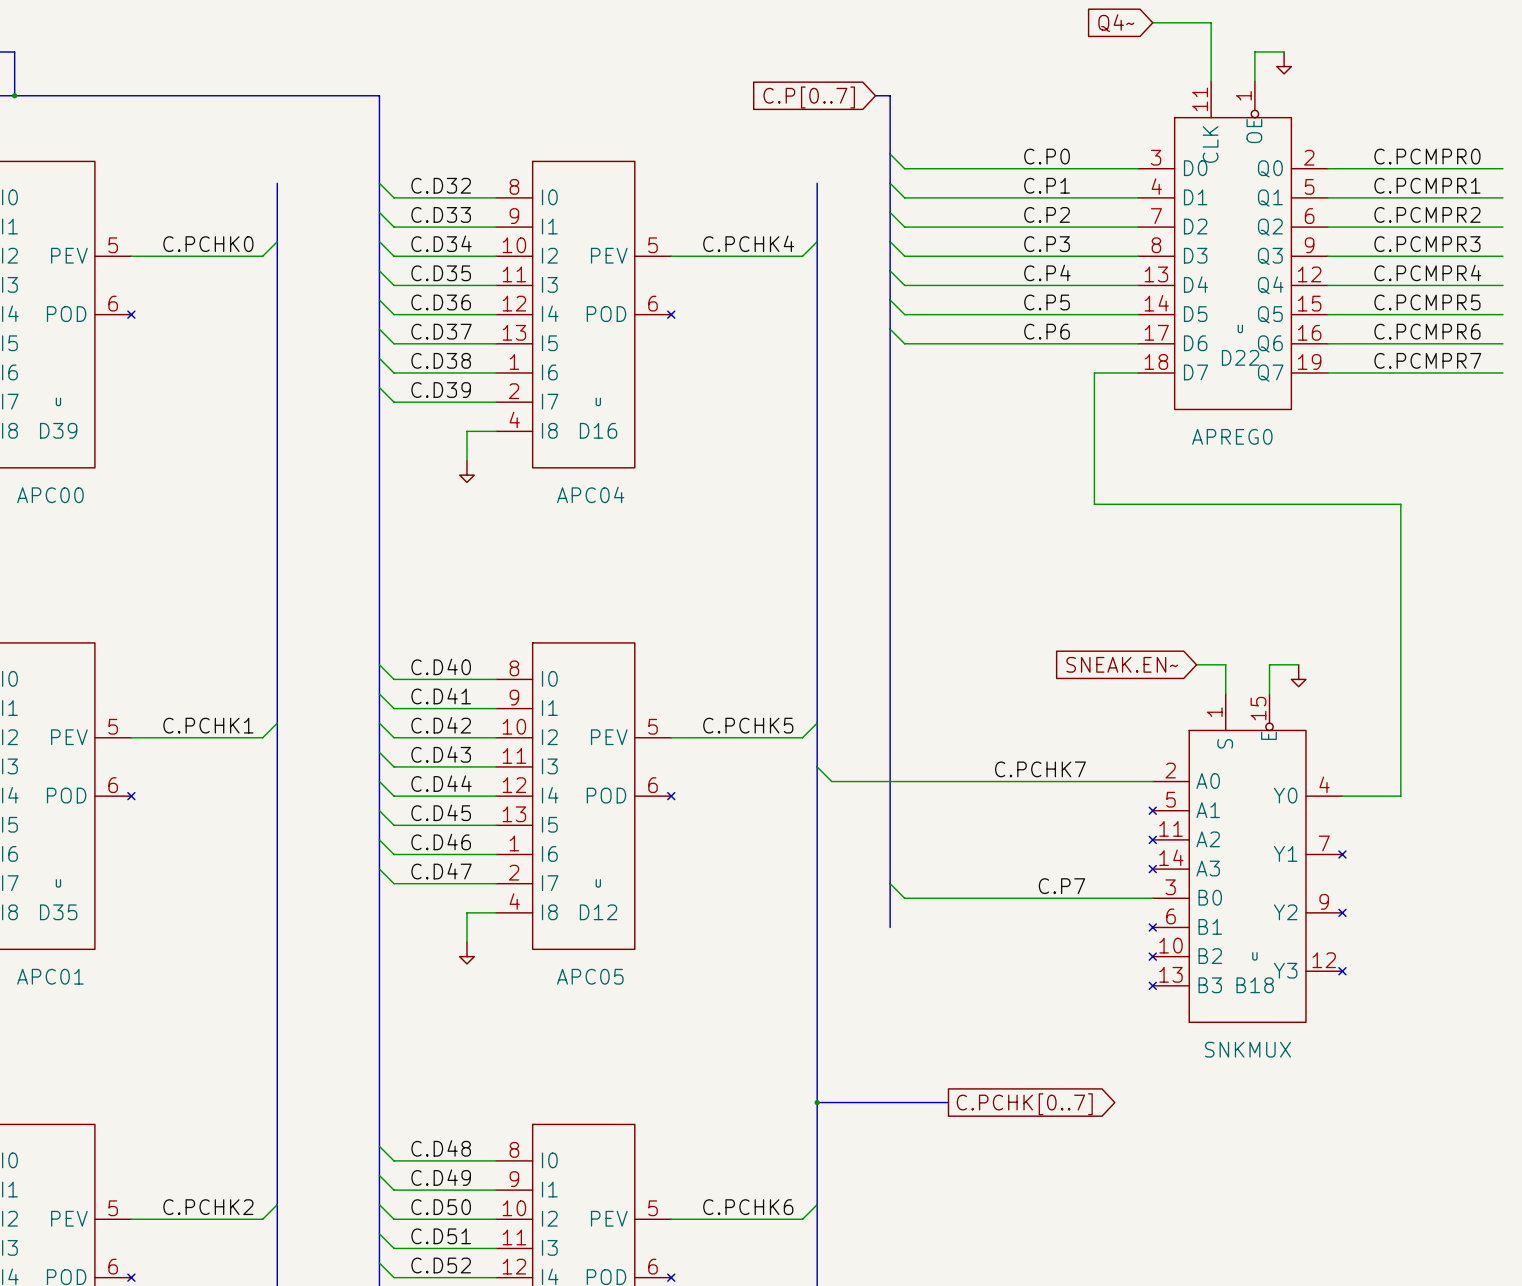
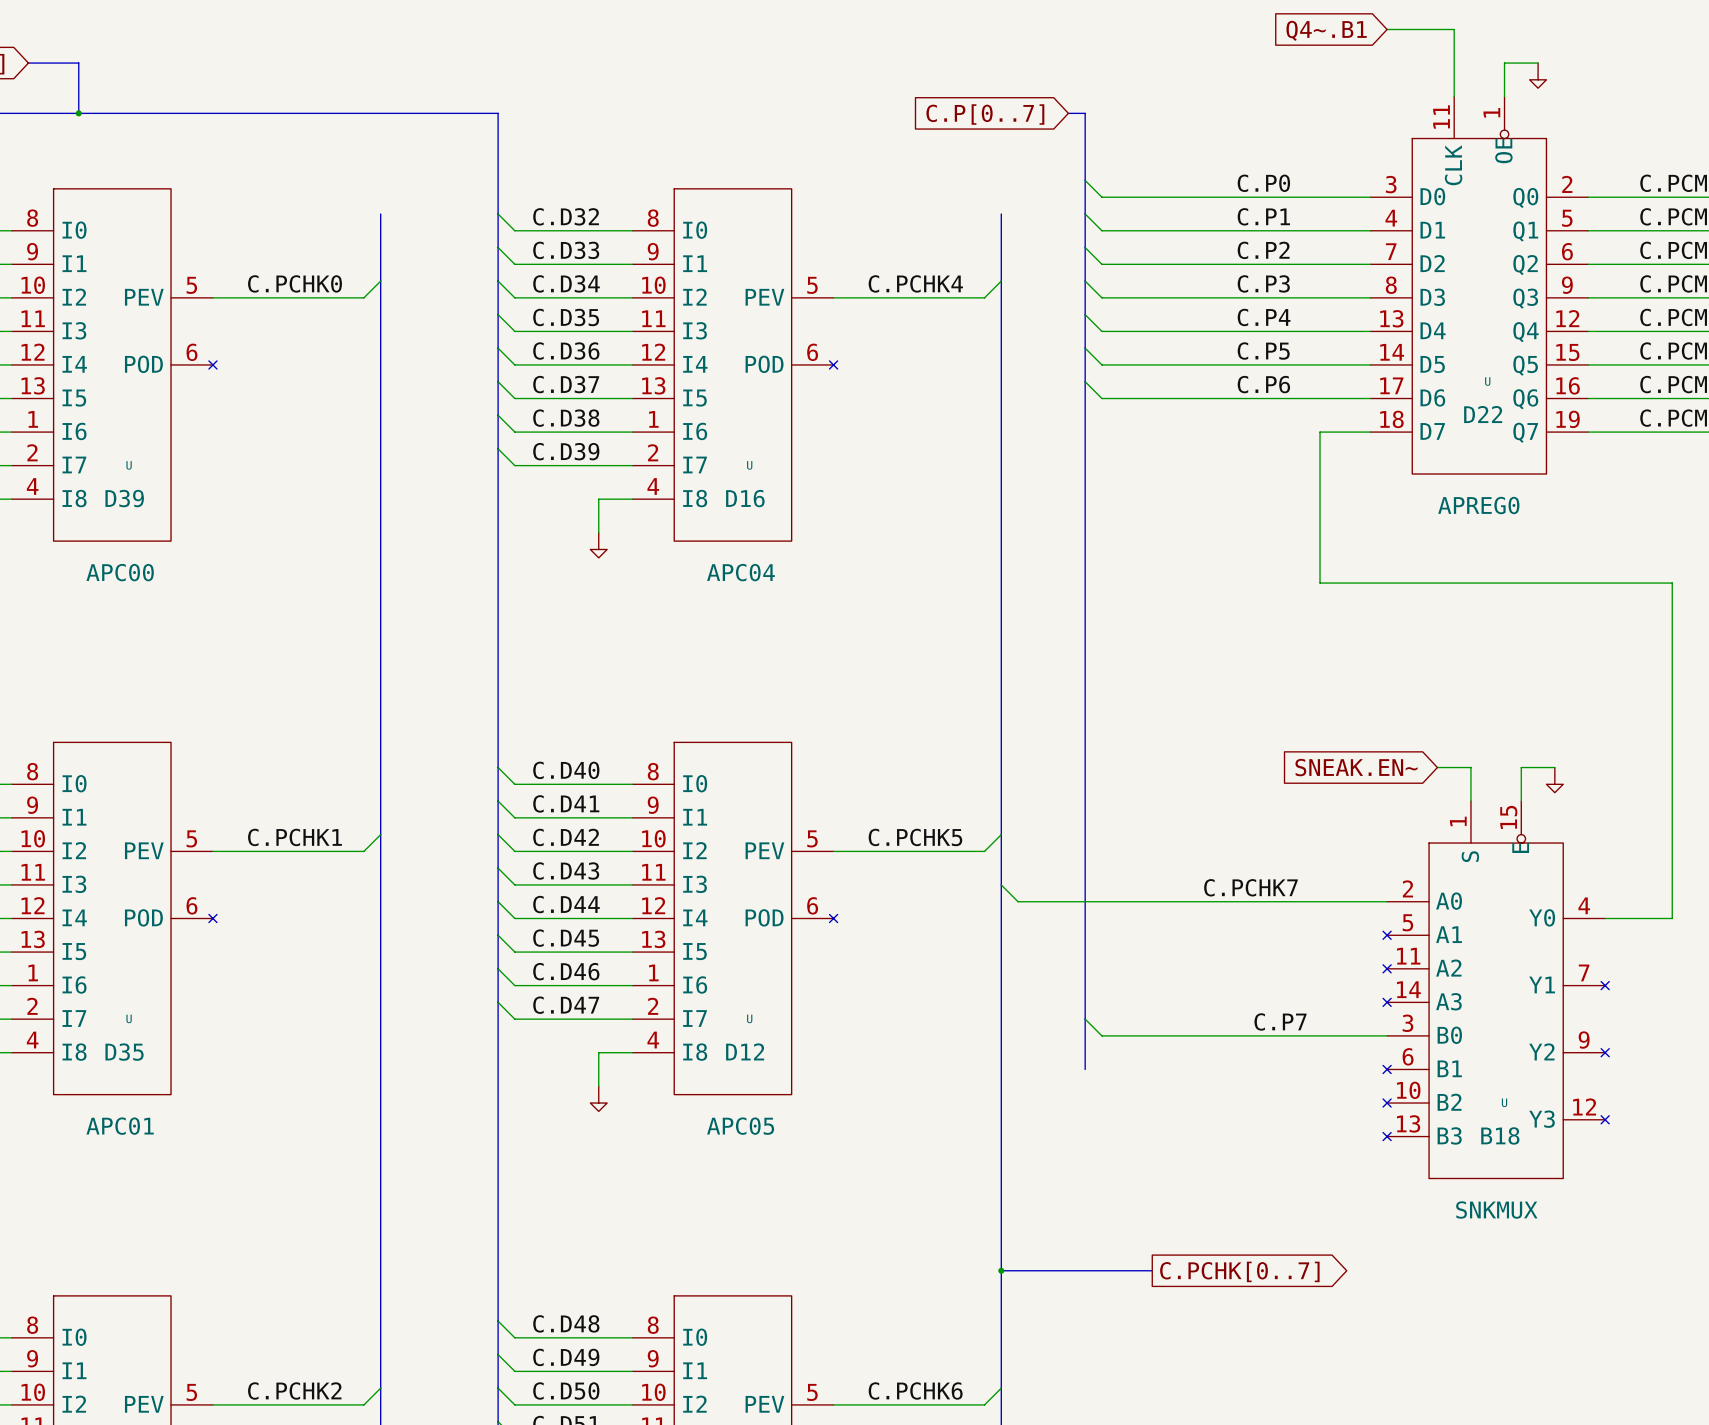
global label: Q4~ (1116, 23) -> Q4~.B1 (1326, 30)

